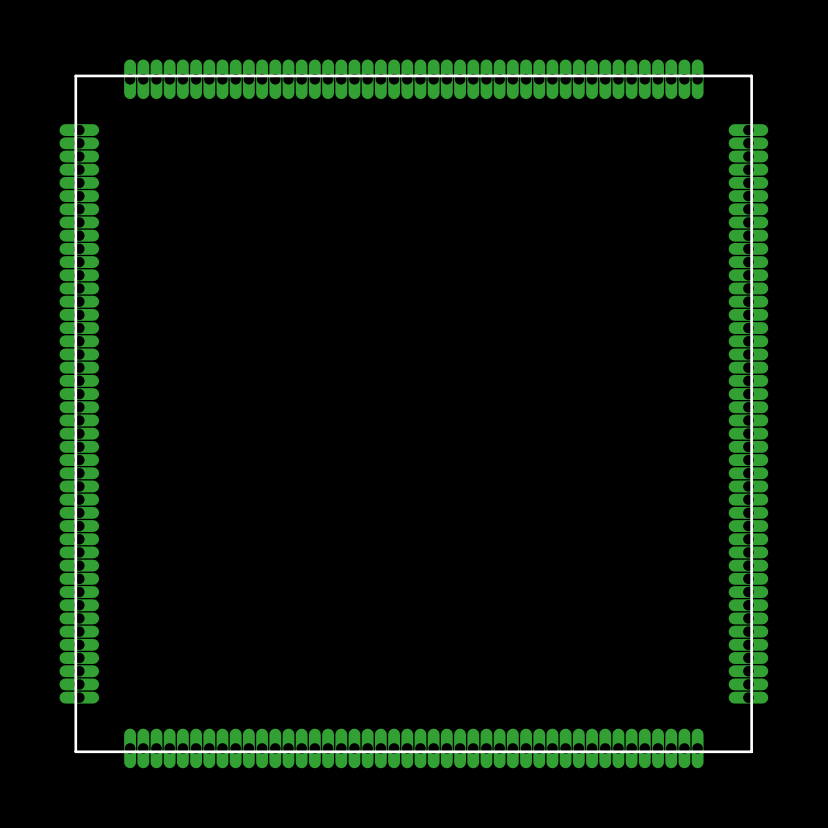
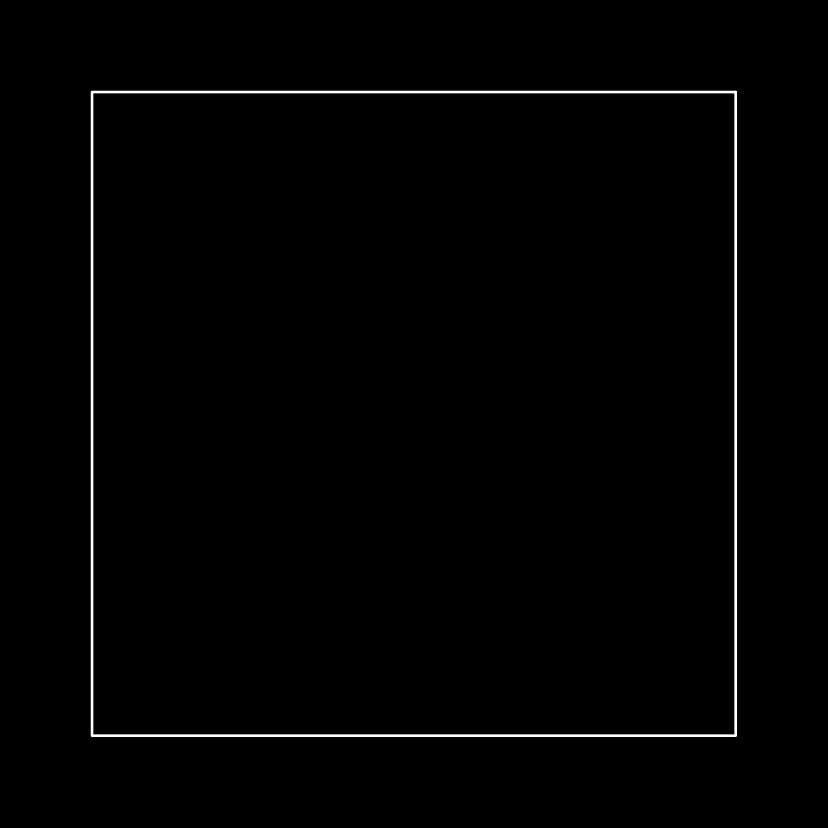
part footprint: [59, 59, 769, 769] -> [90, 90, 738, 738]
board edge: (751, 75) (75, 75) (75, 751) (751, 751) (751, 75) -> none

